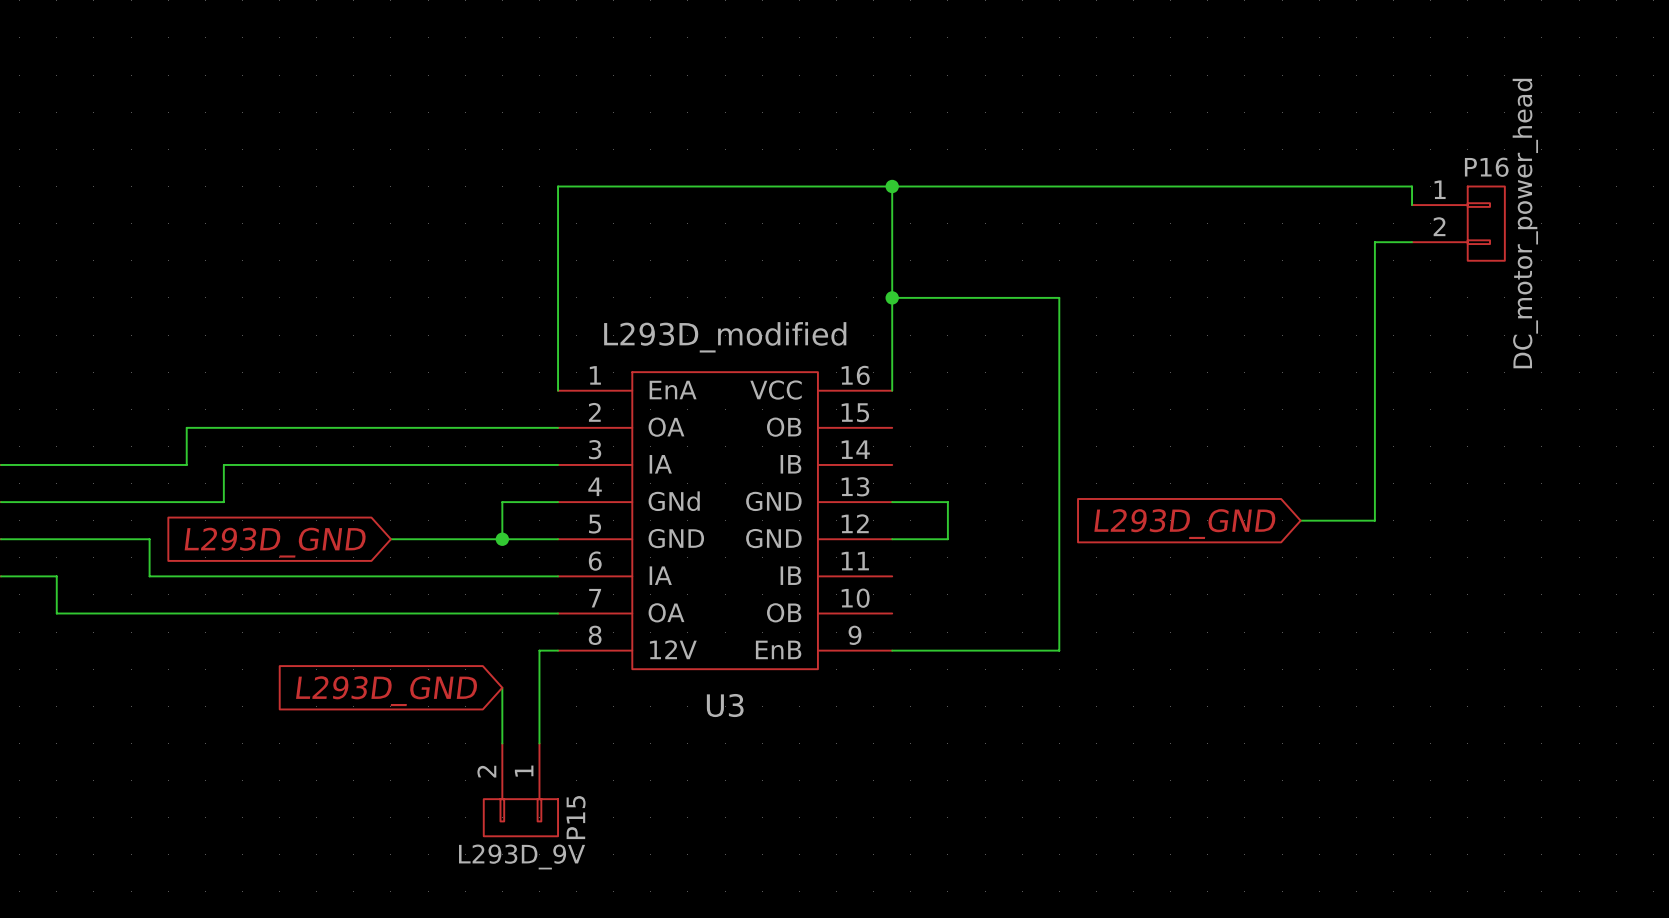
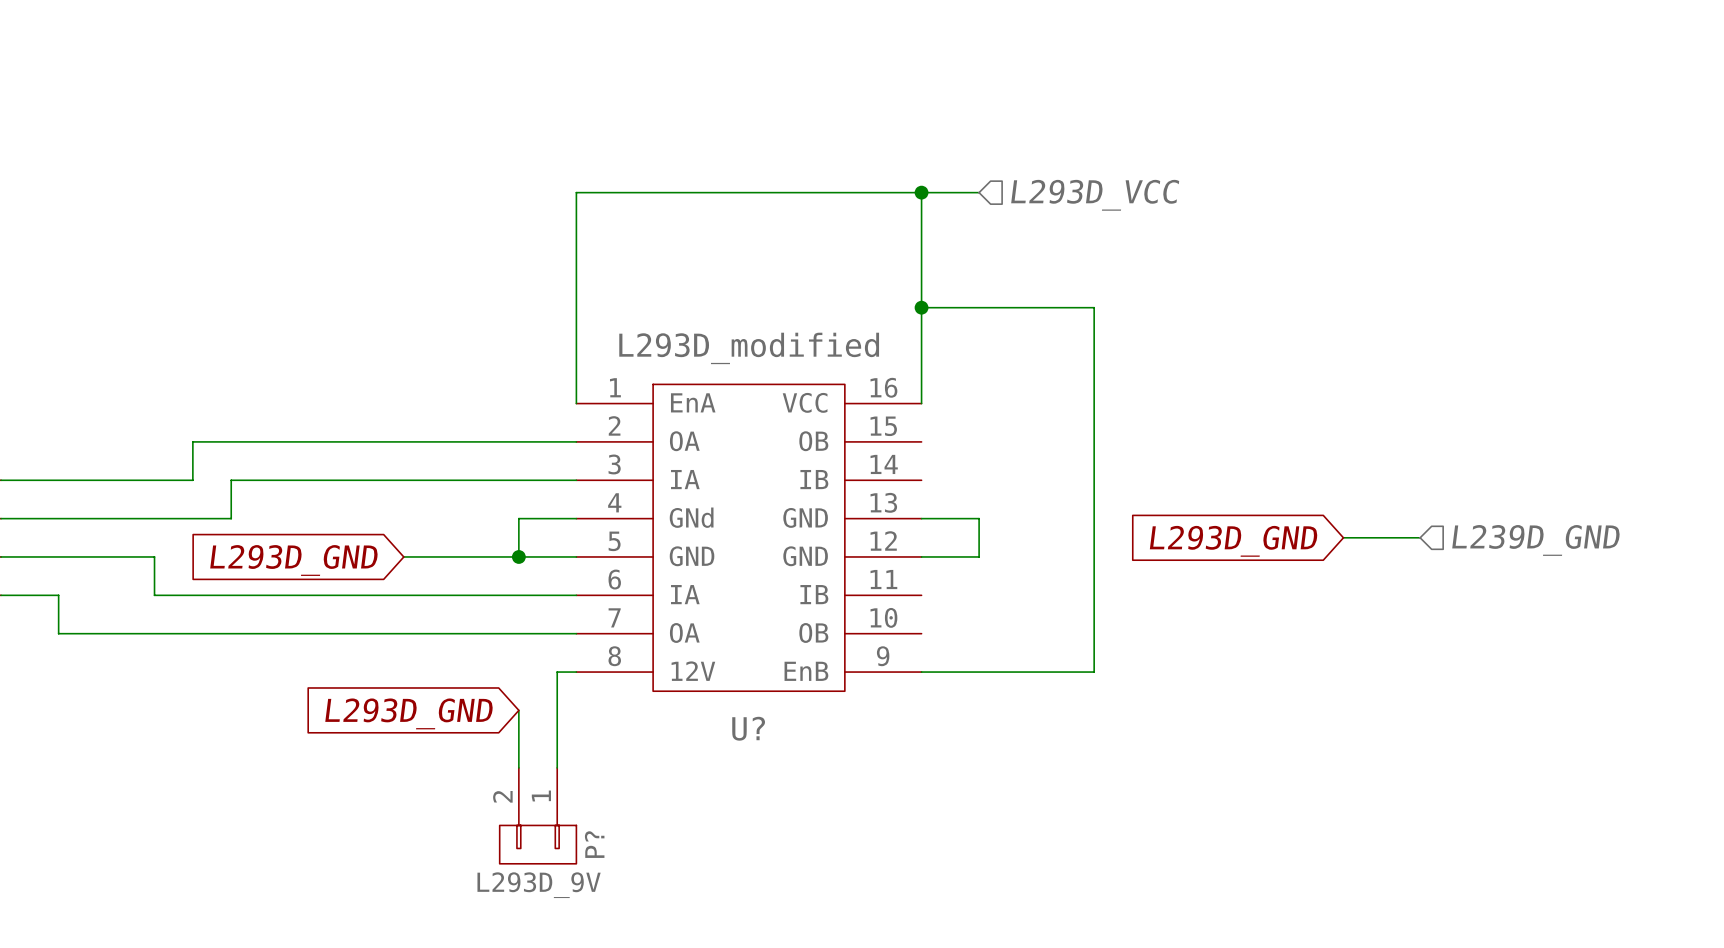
wire: (947, 186) (1412, 186) (1412, 205) -> none
hierarchical label: none -> L293D_VCC (1095, 195)
P16: DC_motor_power_head (1458, 223) -> none
wire: (1412, 242) (1374, 242) (1374, 520) -> none
hierarchical label: none -> L239D_GND (1536, 540)
U3 name: U3 (725, 705) -> U? (748, 728)
P15 name: P15 (576, 817) -> P? (594, 844)

